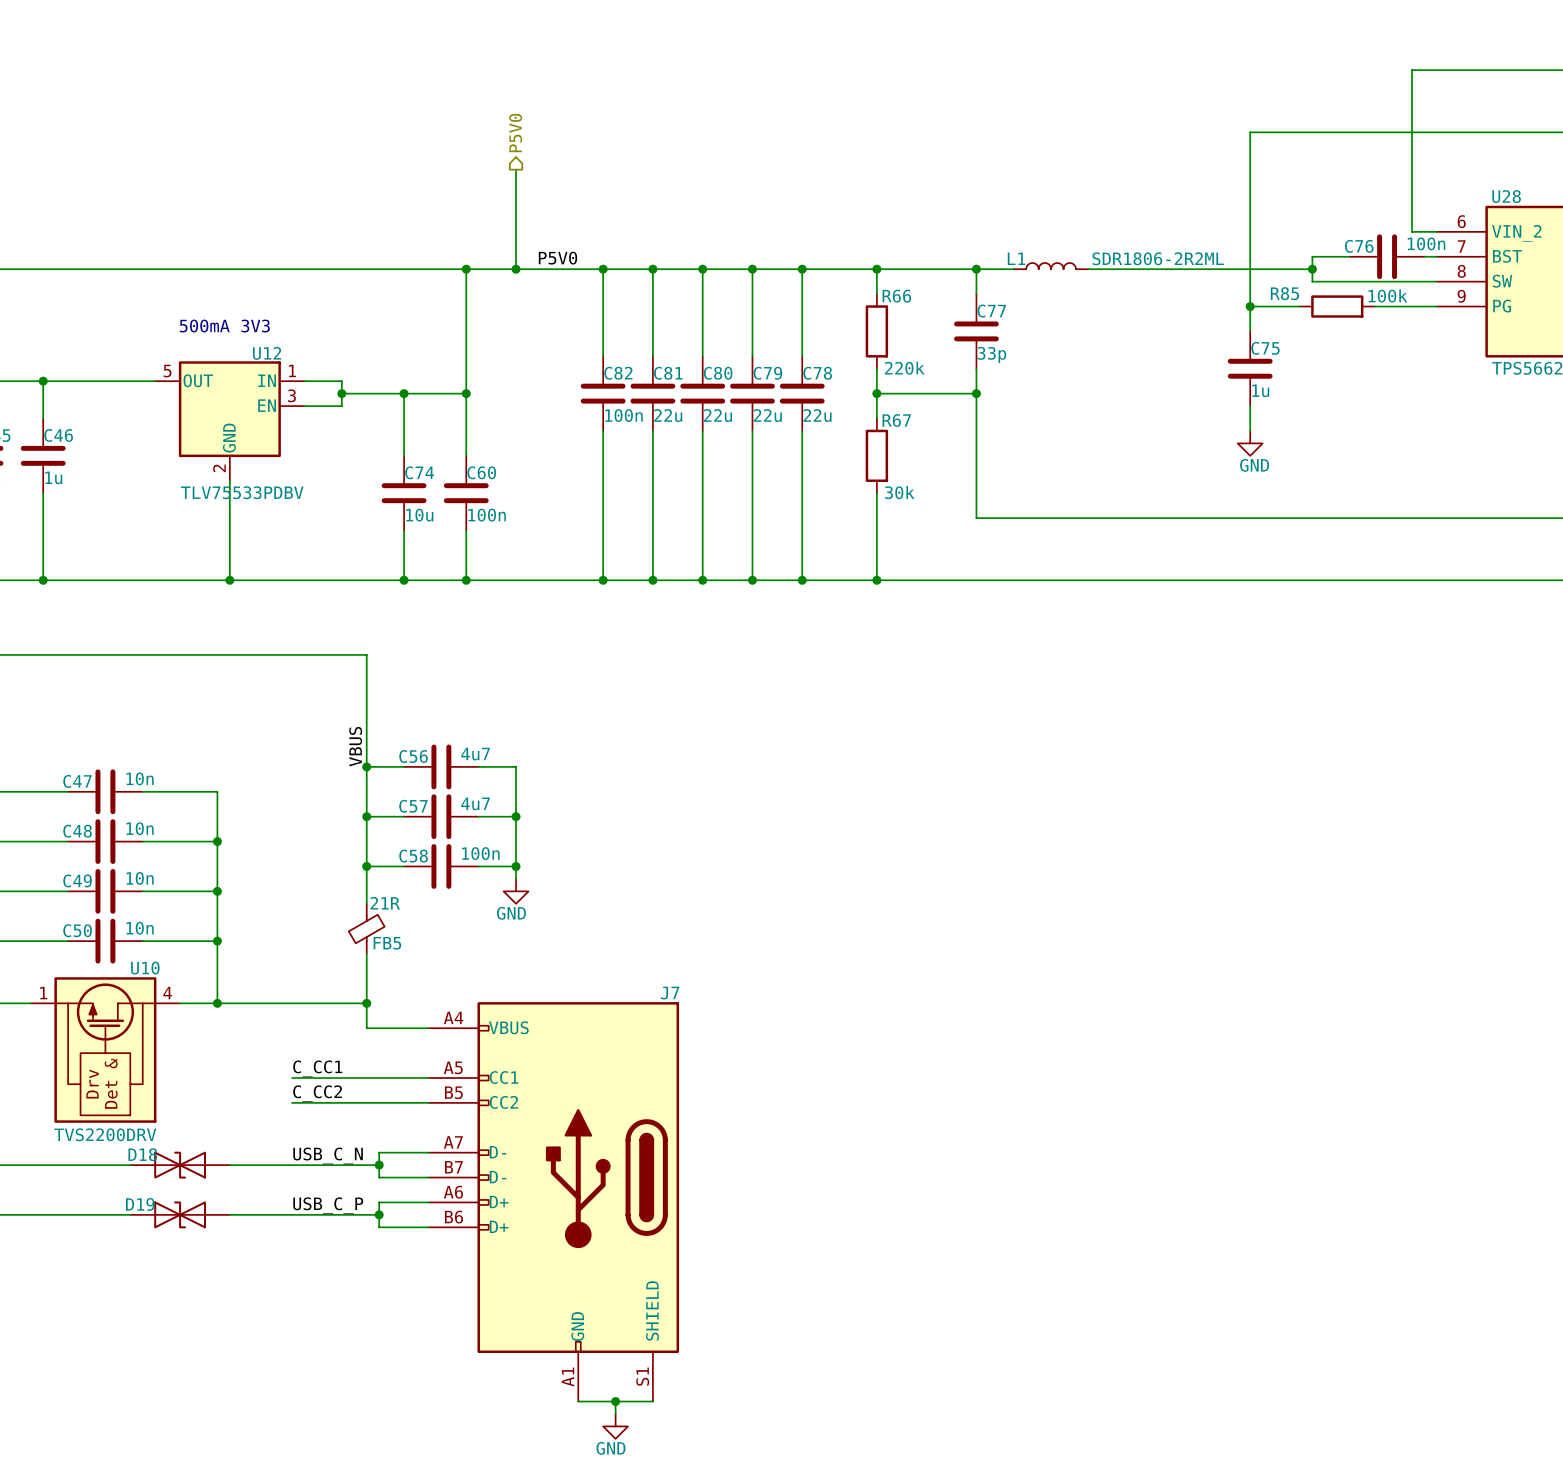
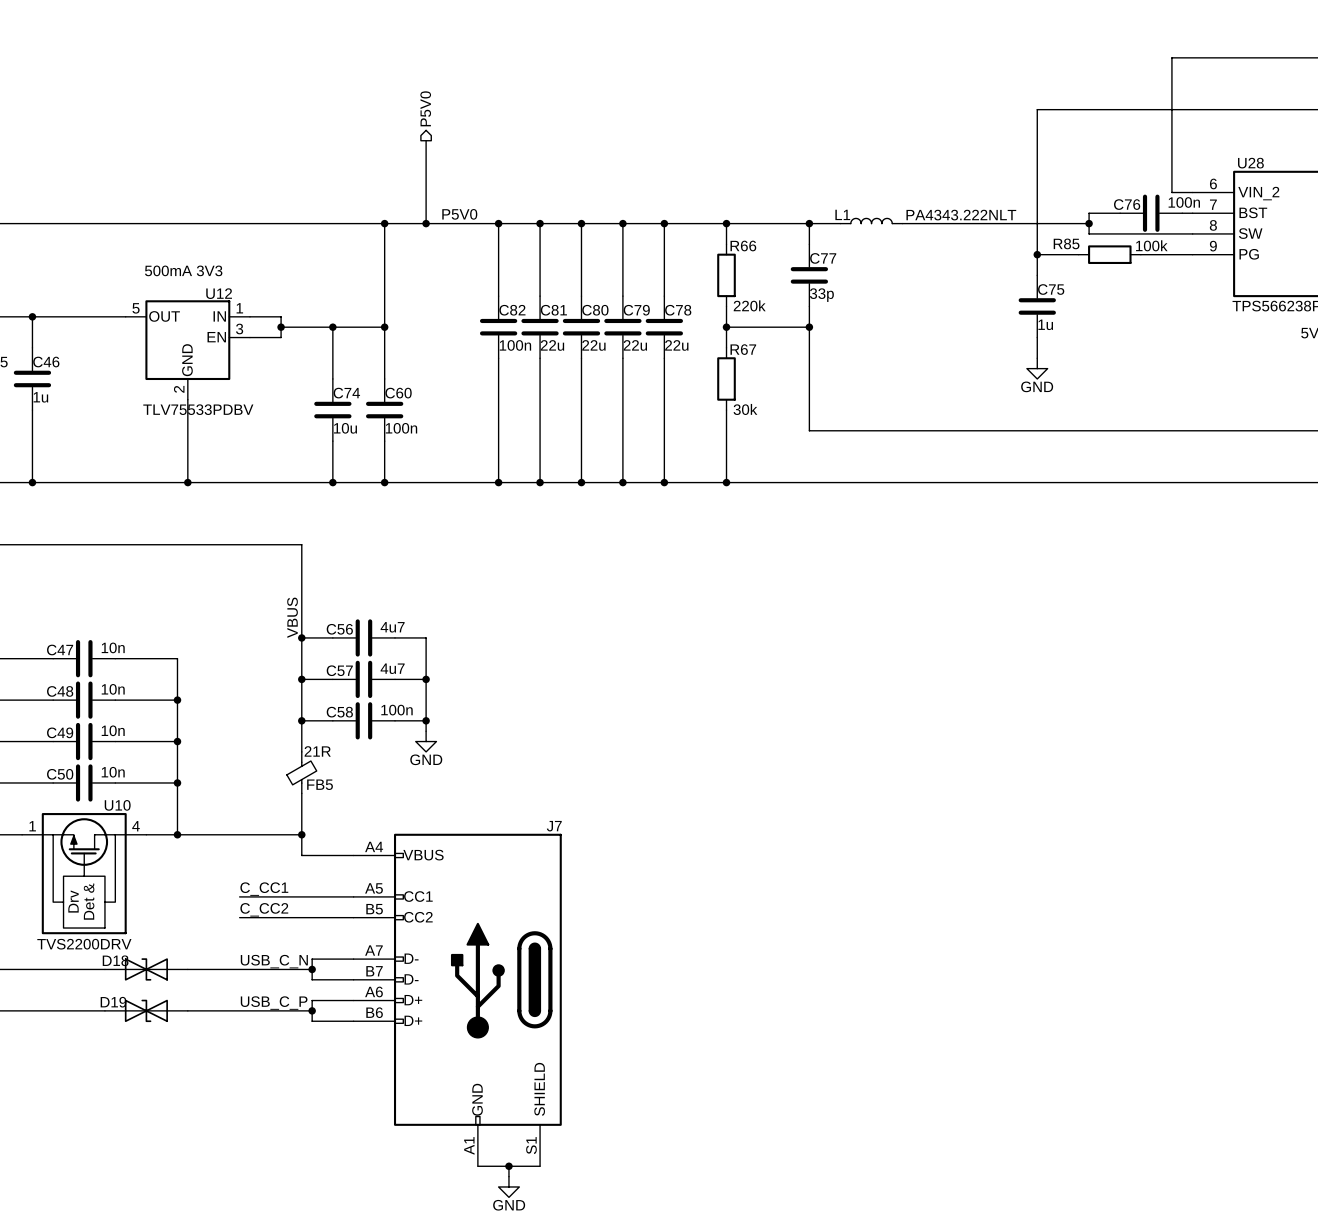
L1 value: SDR1806-2R2ML (1158, 258) -> PA4343.222NLT (961, 215)

